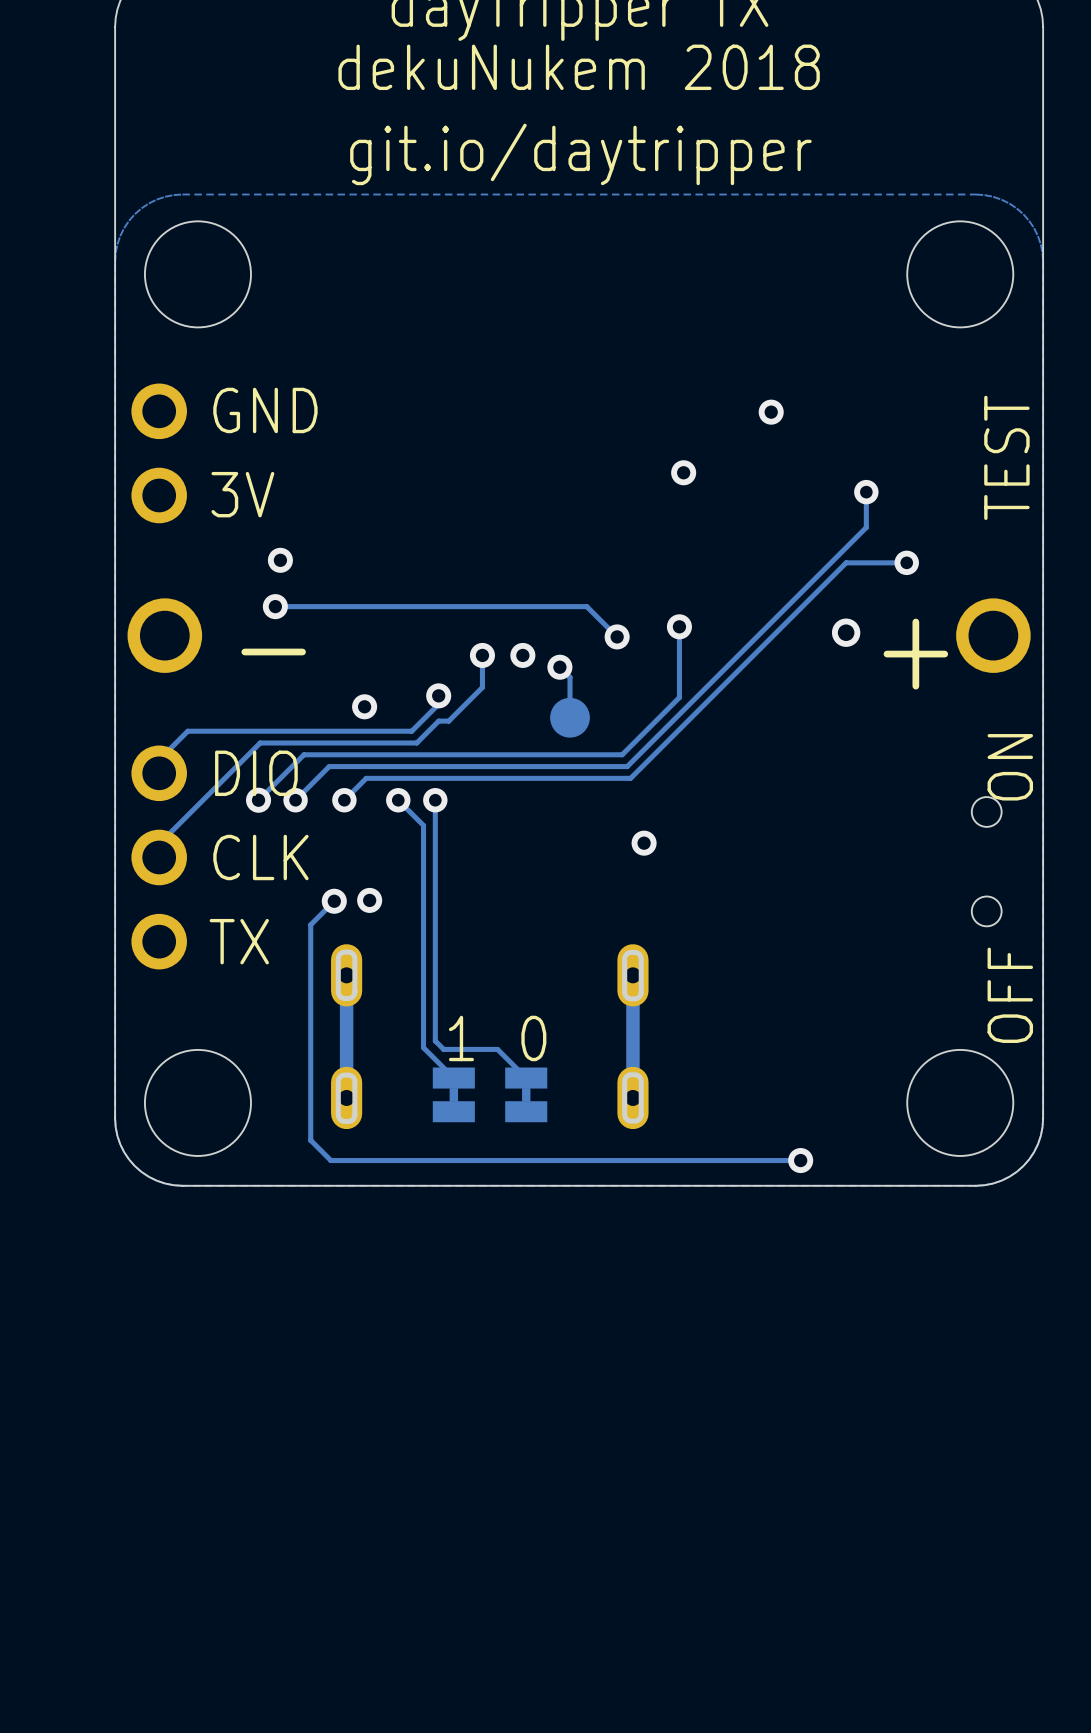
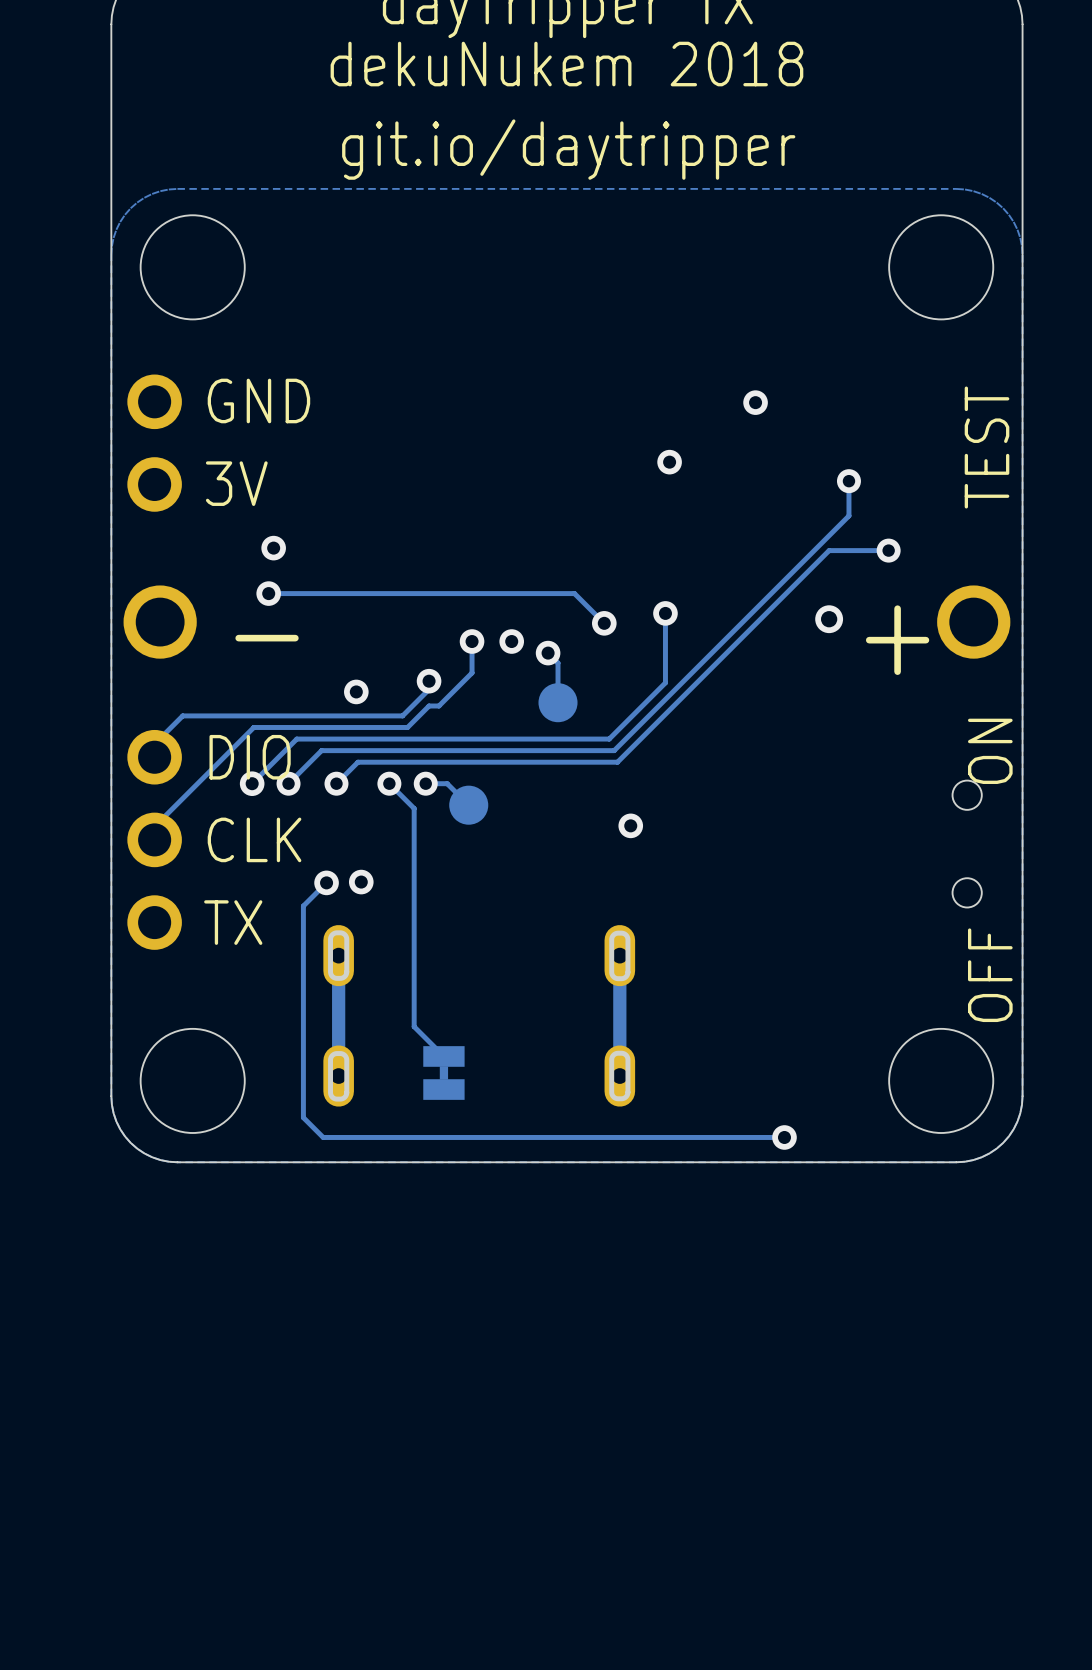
track: (435, 800) (435, 1041) (443, 1049) (497, 1049) (526, 1078) -> none
track: none -> (429, 783) (447, 783) (468, 805)
part: none -> (468, 805)
text: 1 (461, 1038) -> none
text: 0 (533, 1038) -> none
part: (526, 1094) -> none

